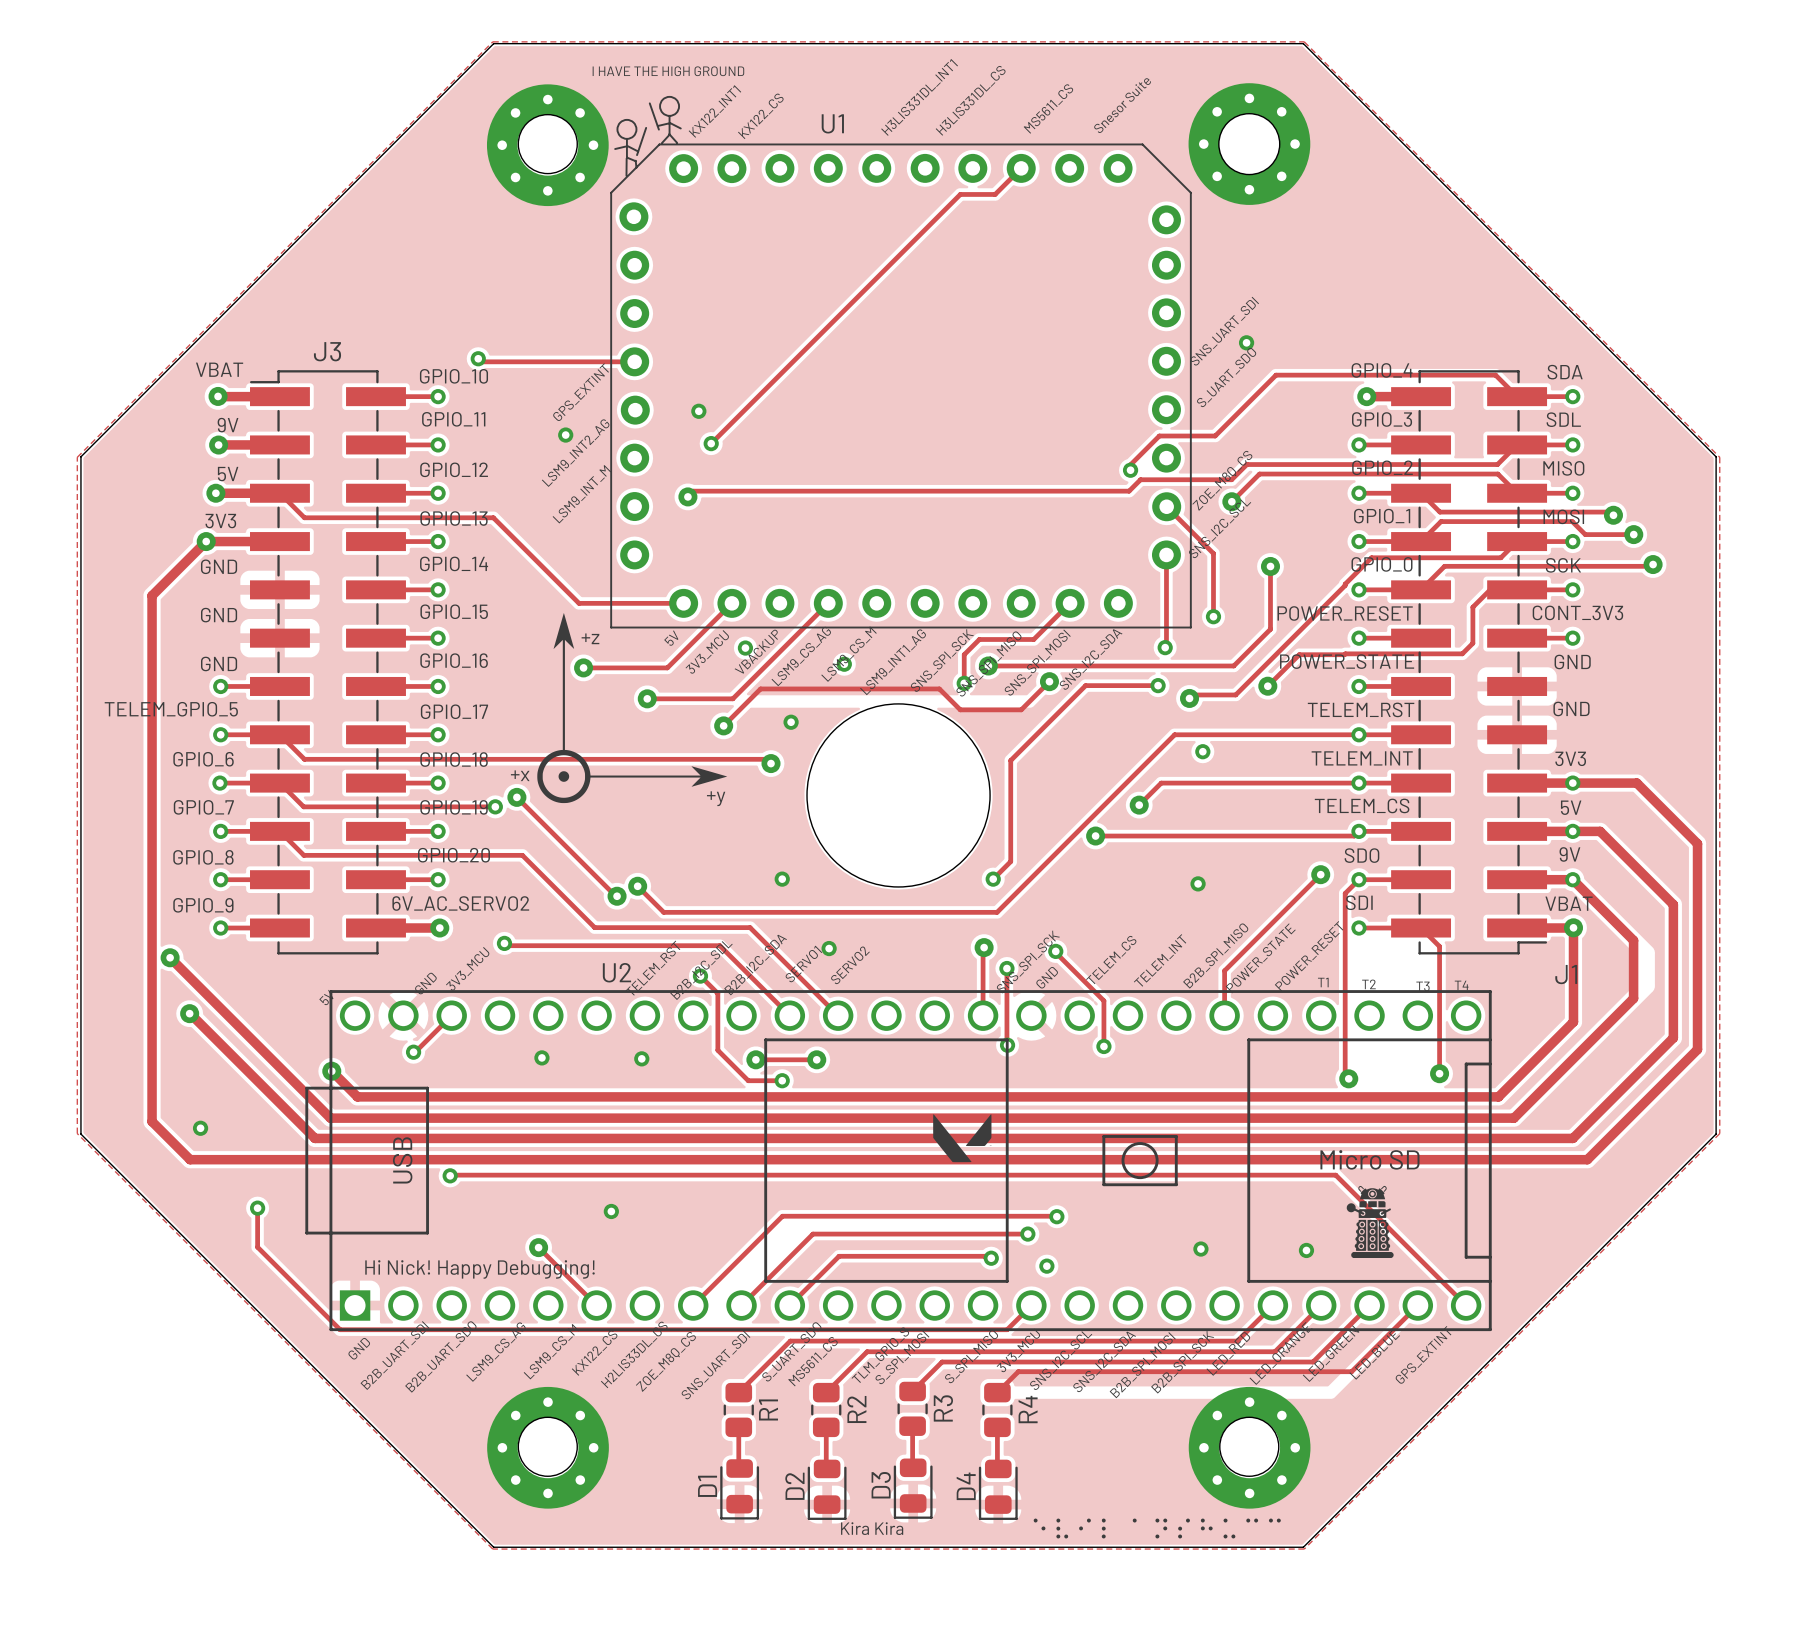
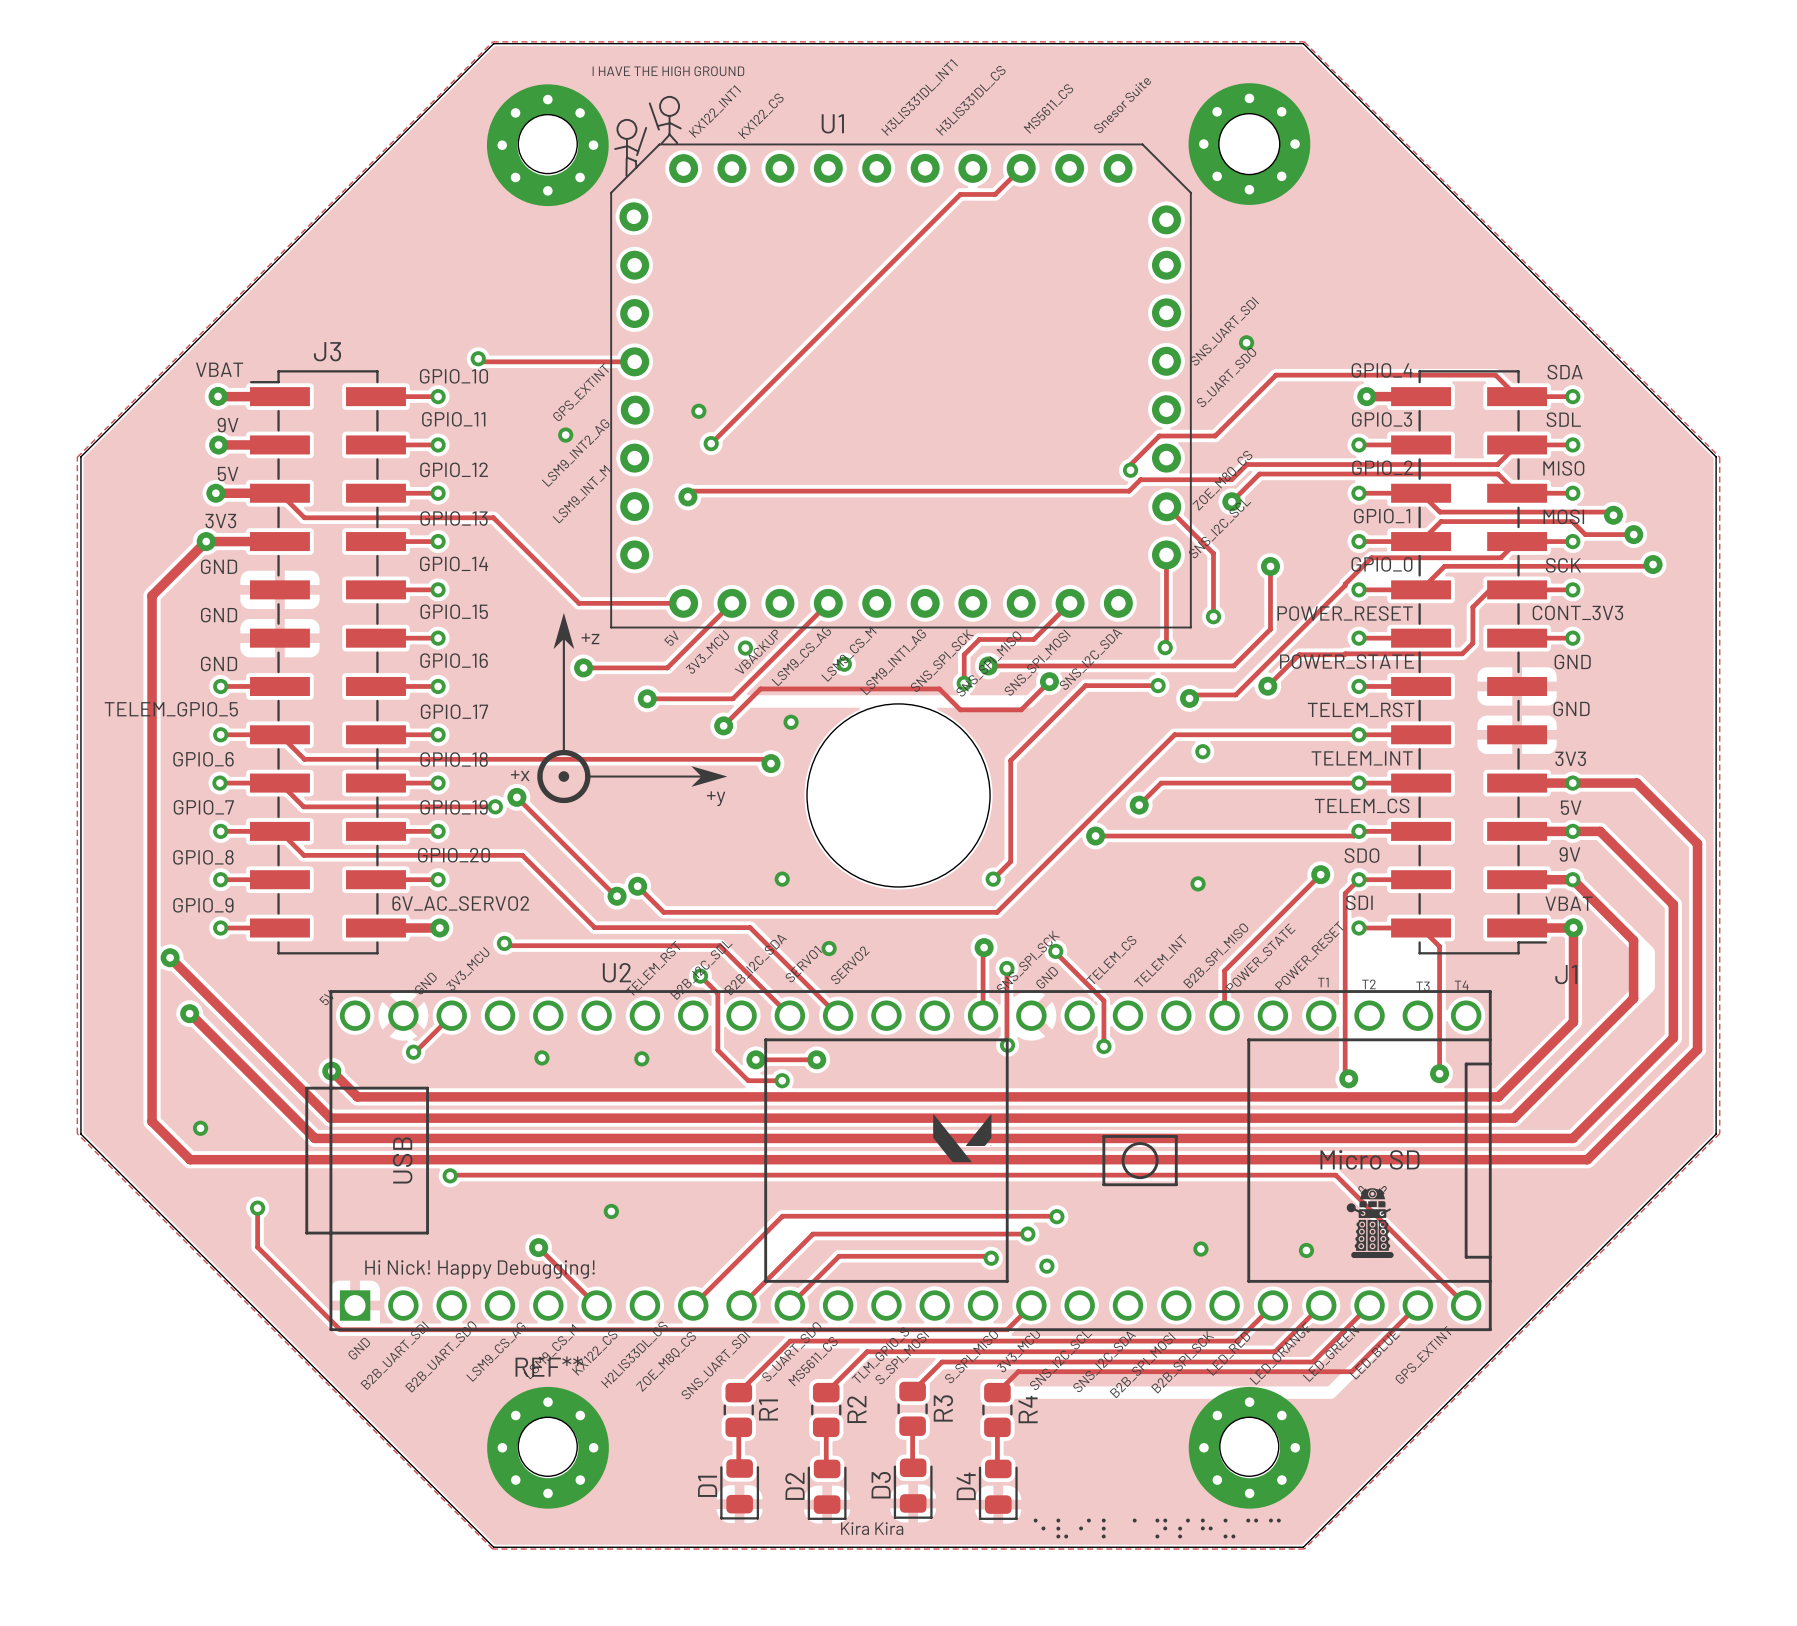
REF** name: none -> REF** (548, 1366)

